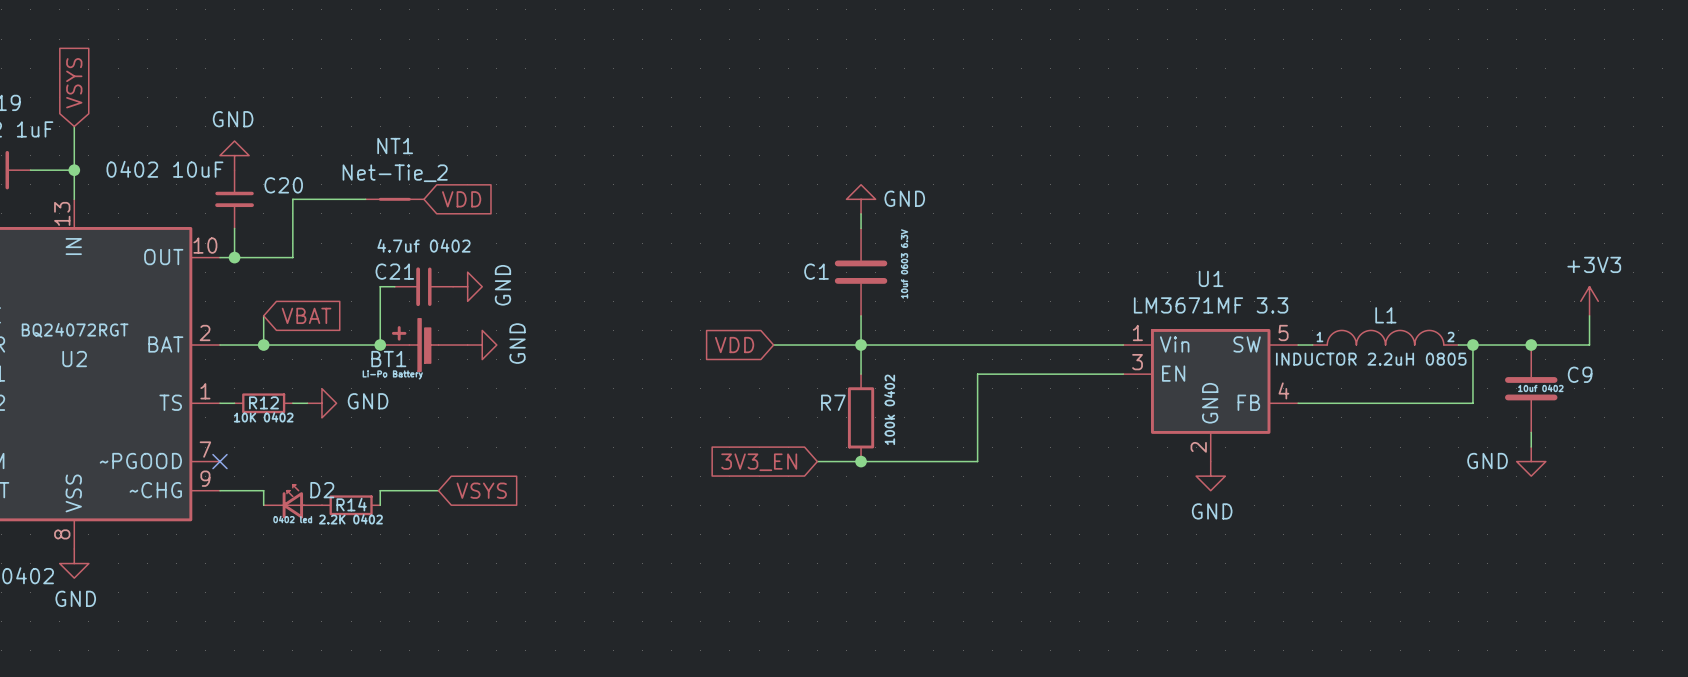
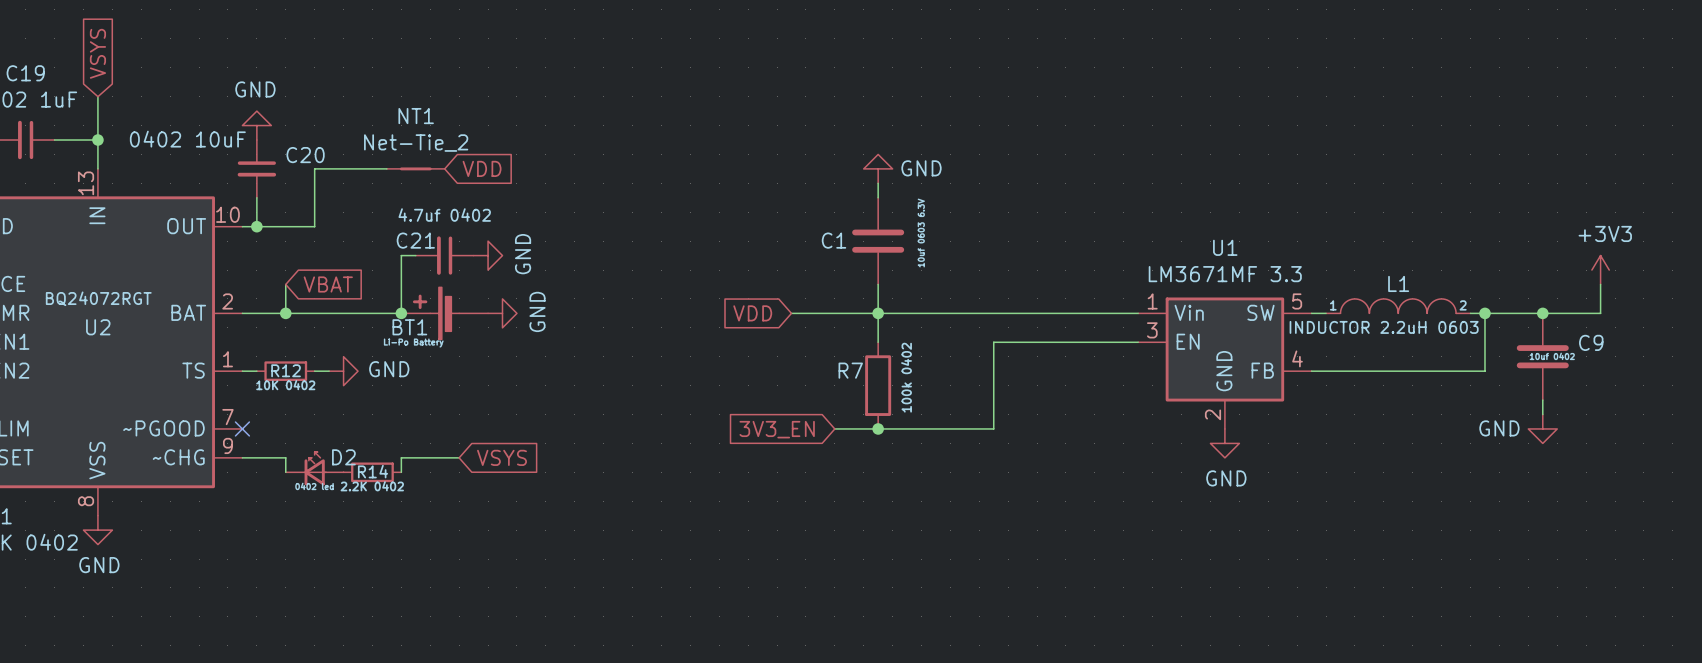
L1 value: INDUCTOR 2.2uH 0805 (1371, 359) -> INDUCTOR 2.2uH 0603 (1384, 327)

